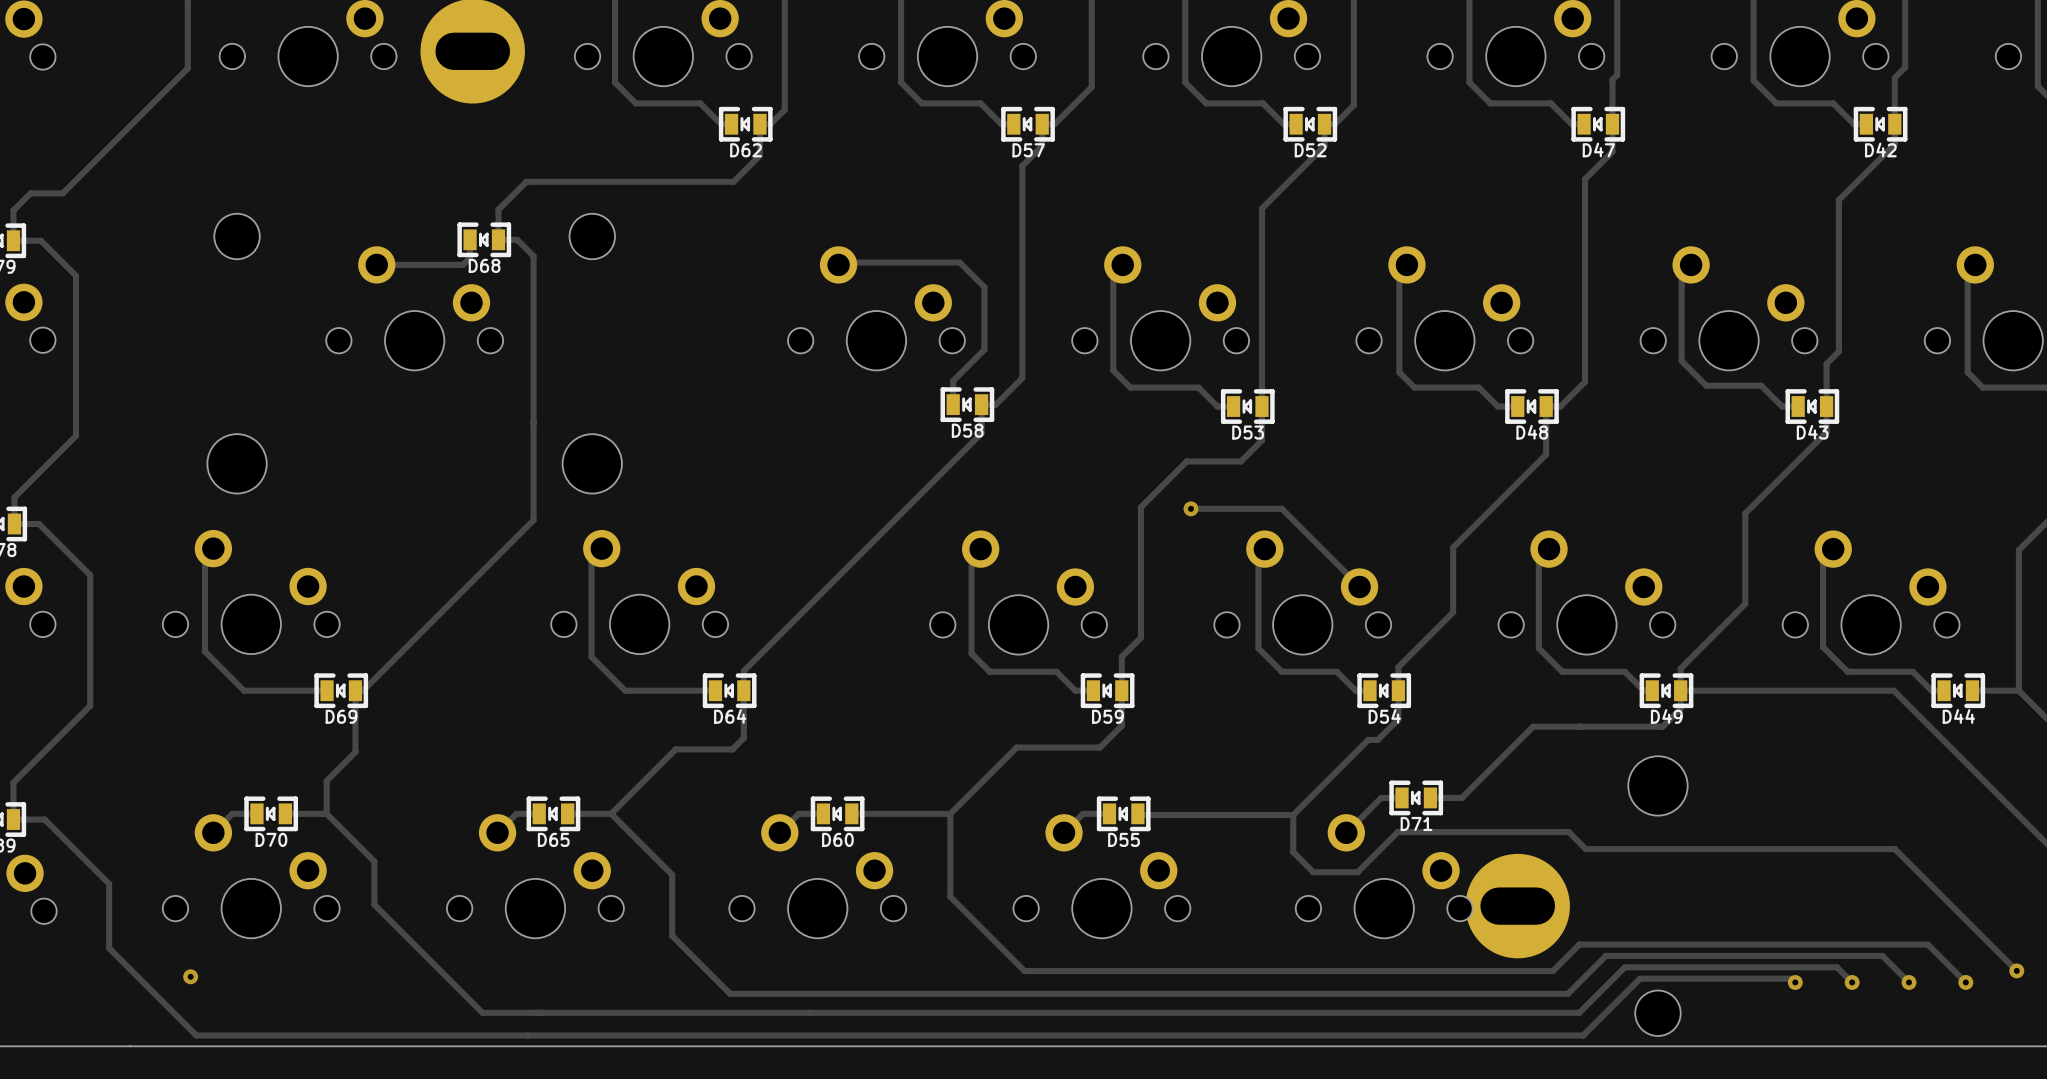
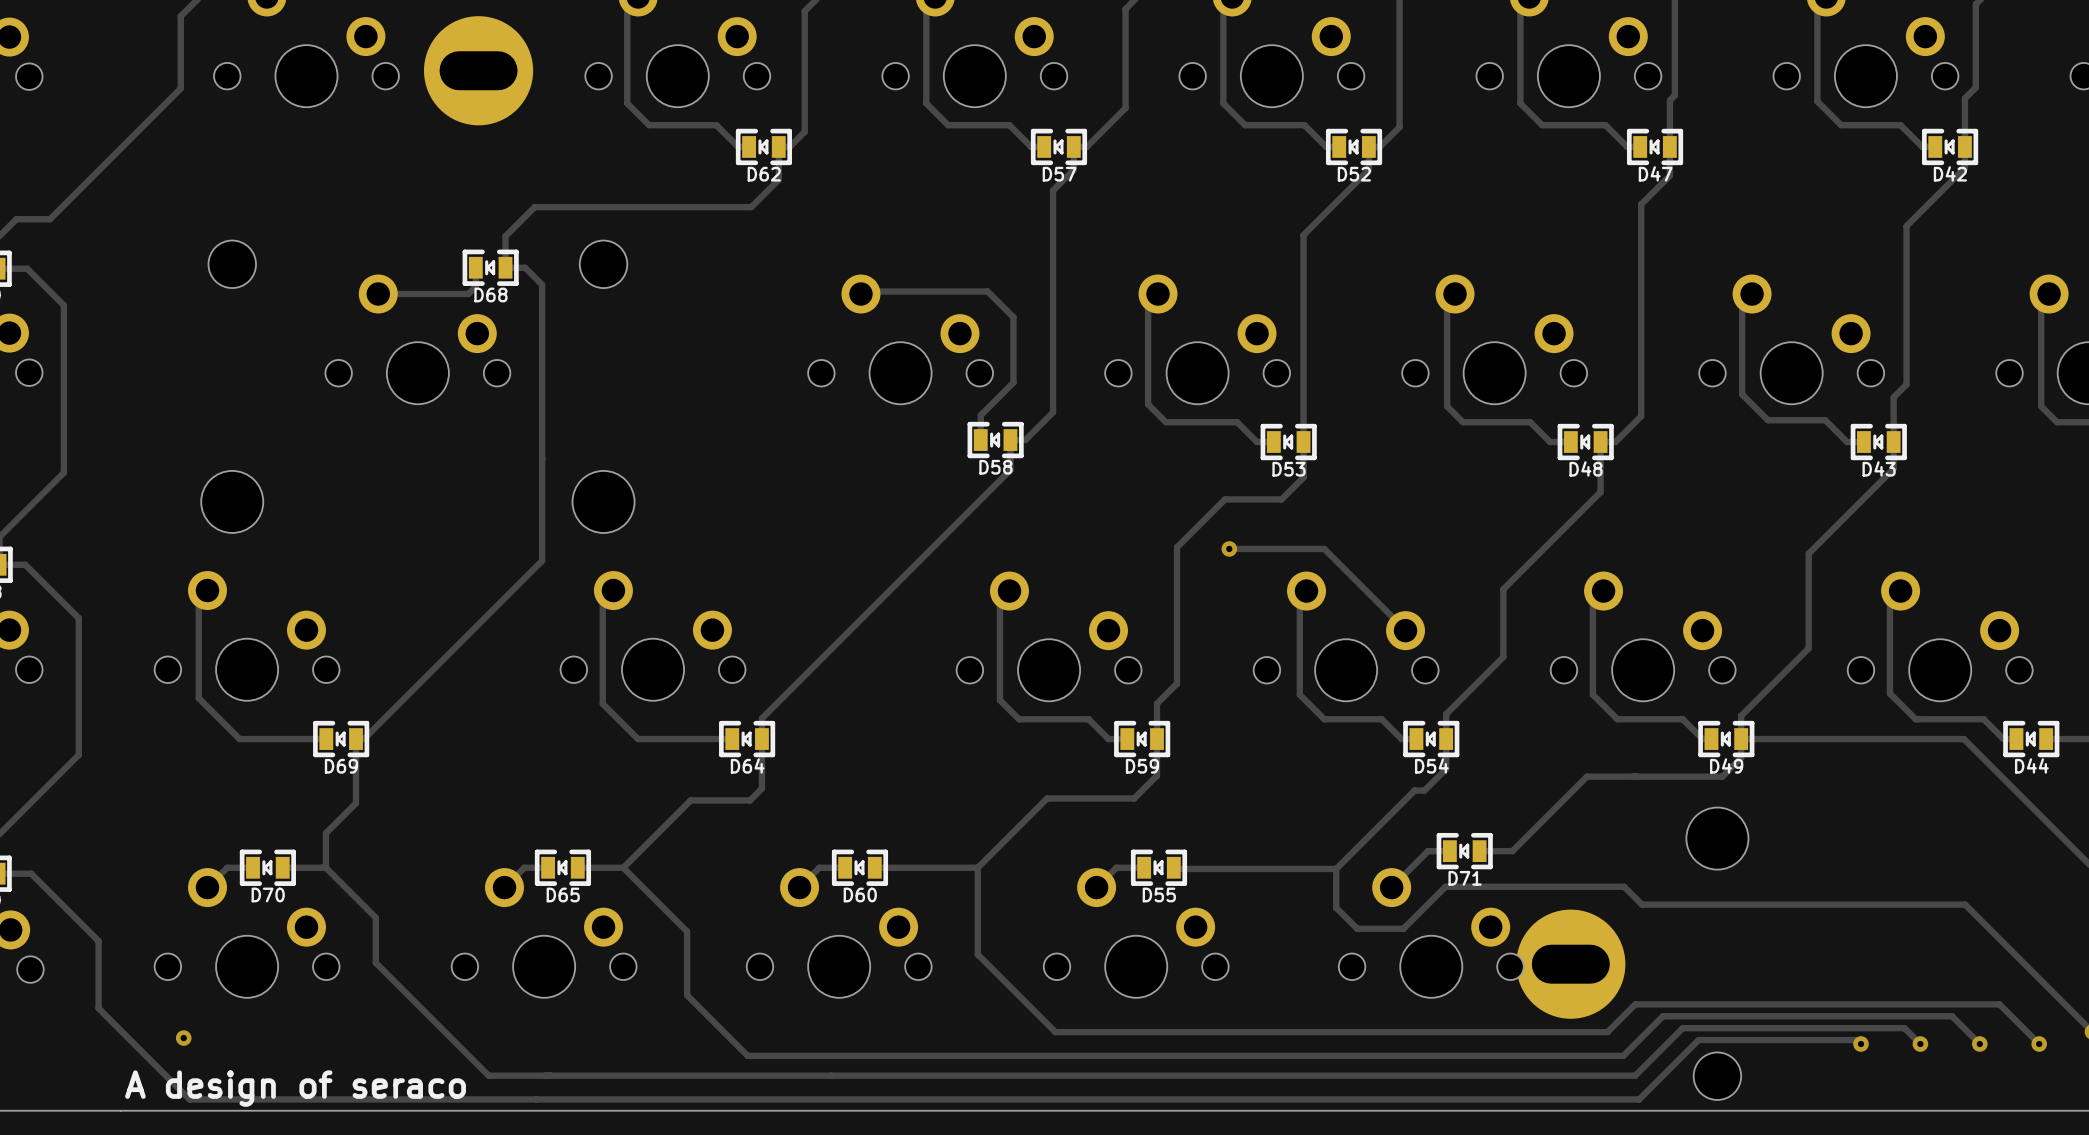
text: none -> A design of seraco (295, 1088)

